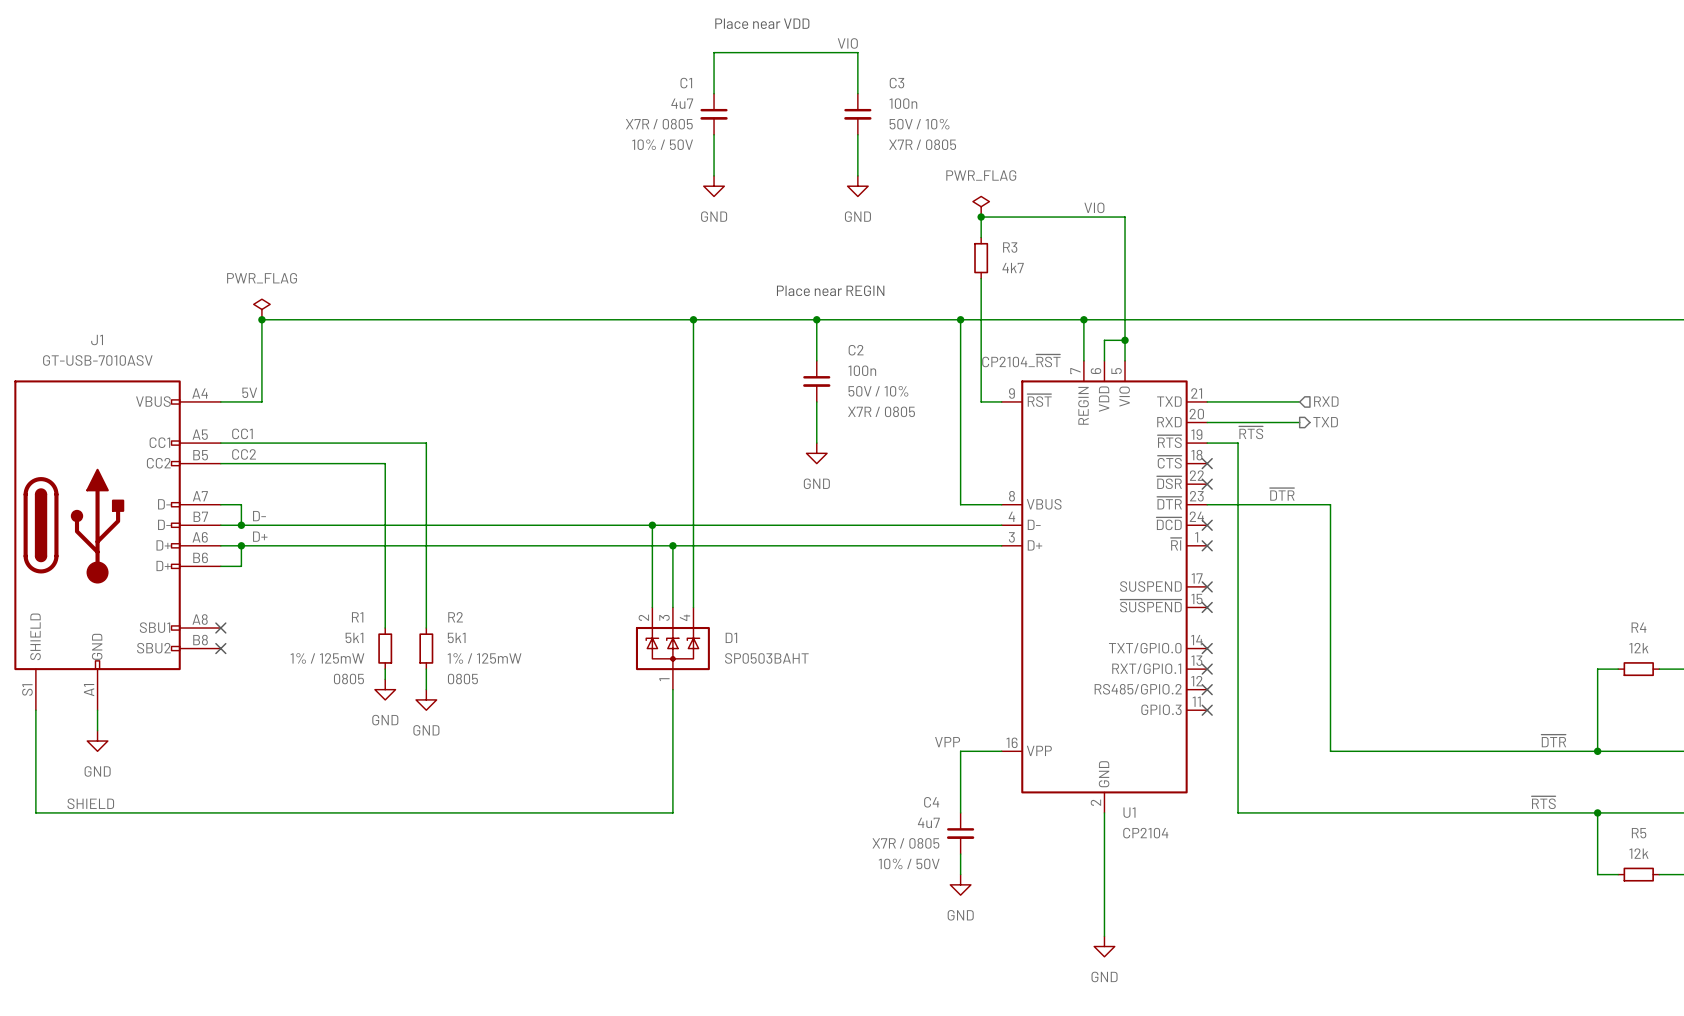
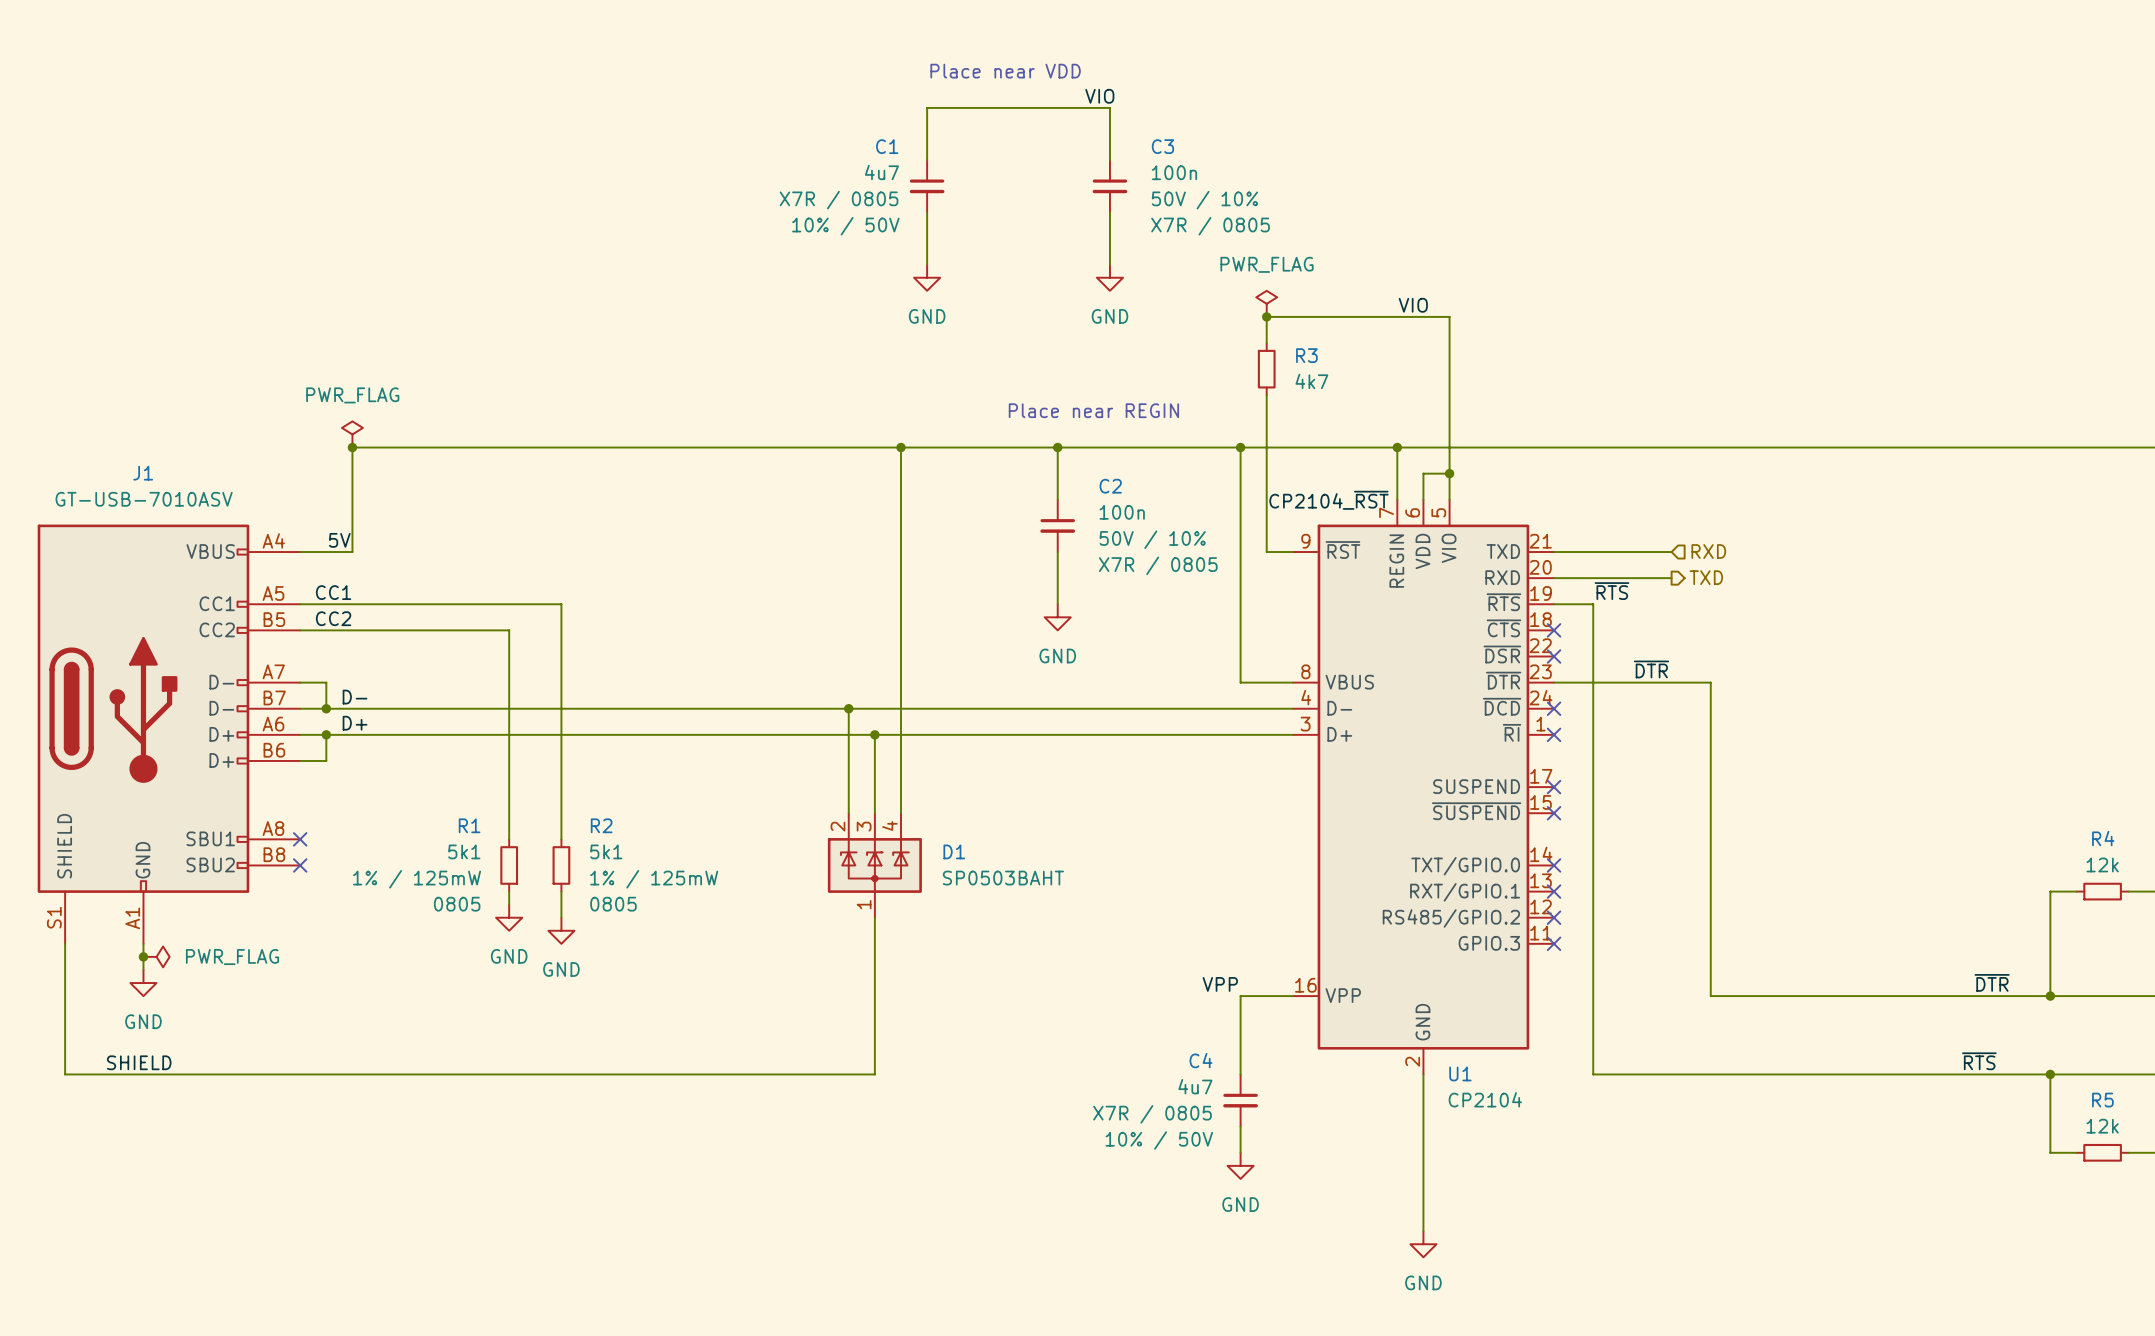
junction: none -> (143, 956)
power symbol: none -> PWR_FLAG (156, 956)

